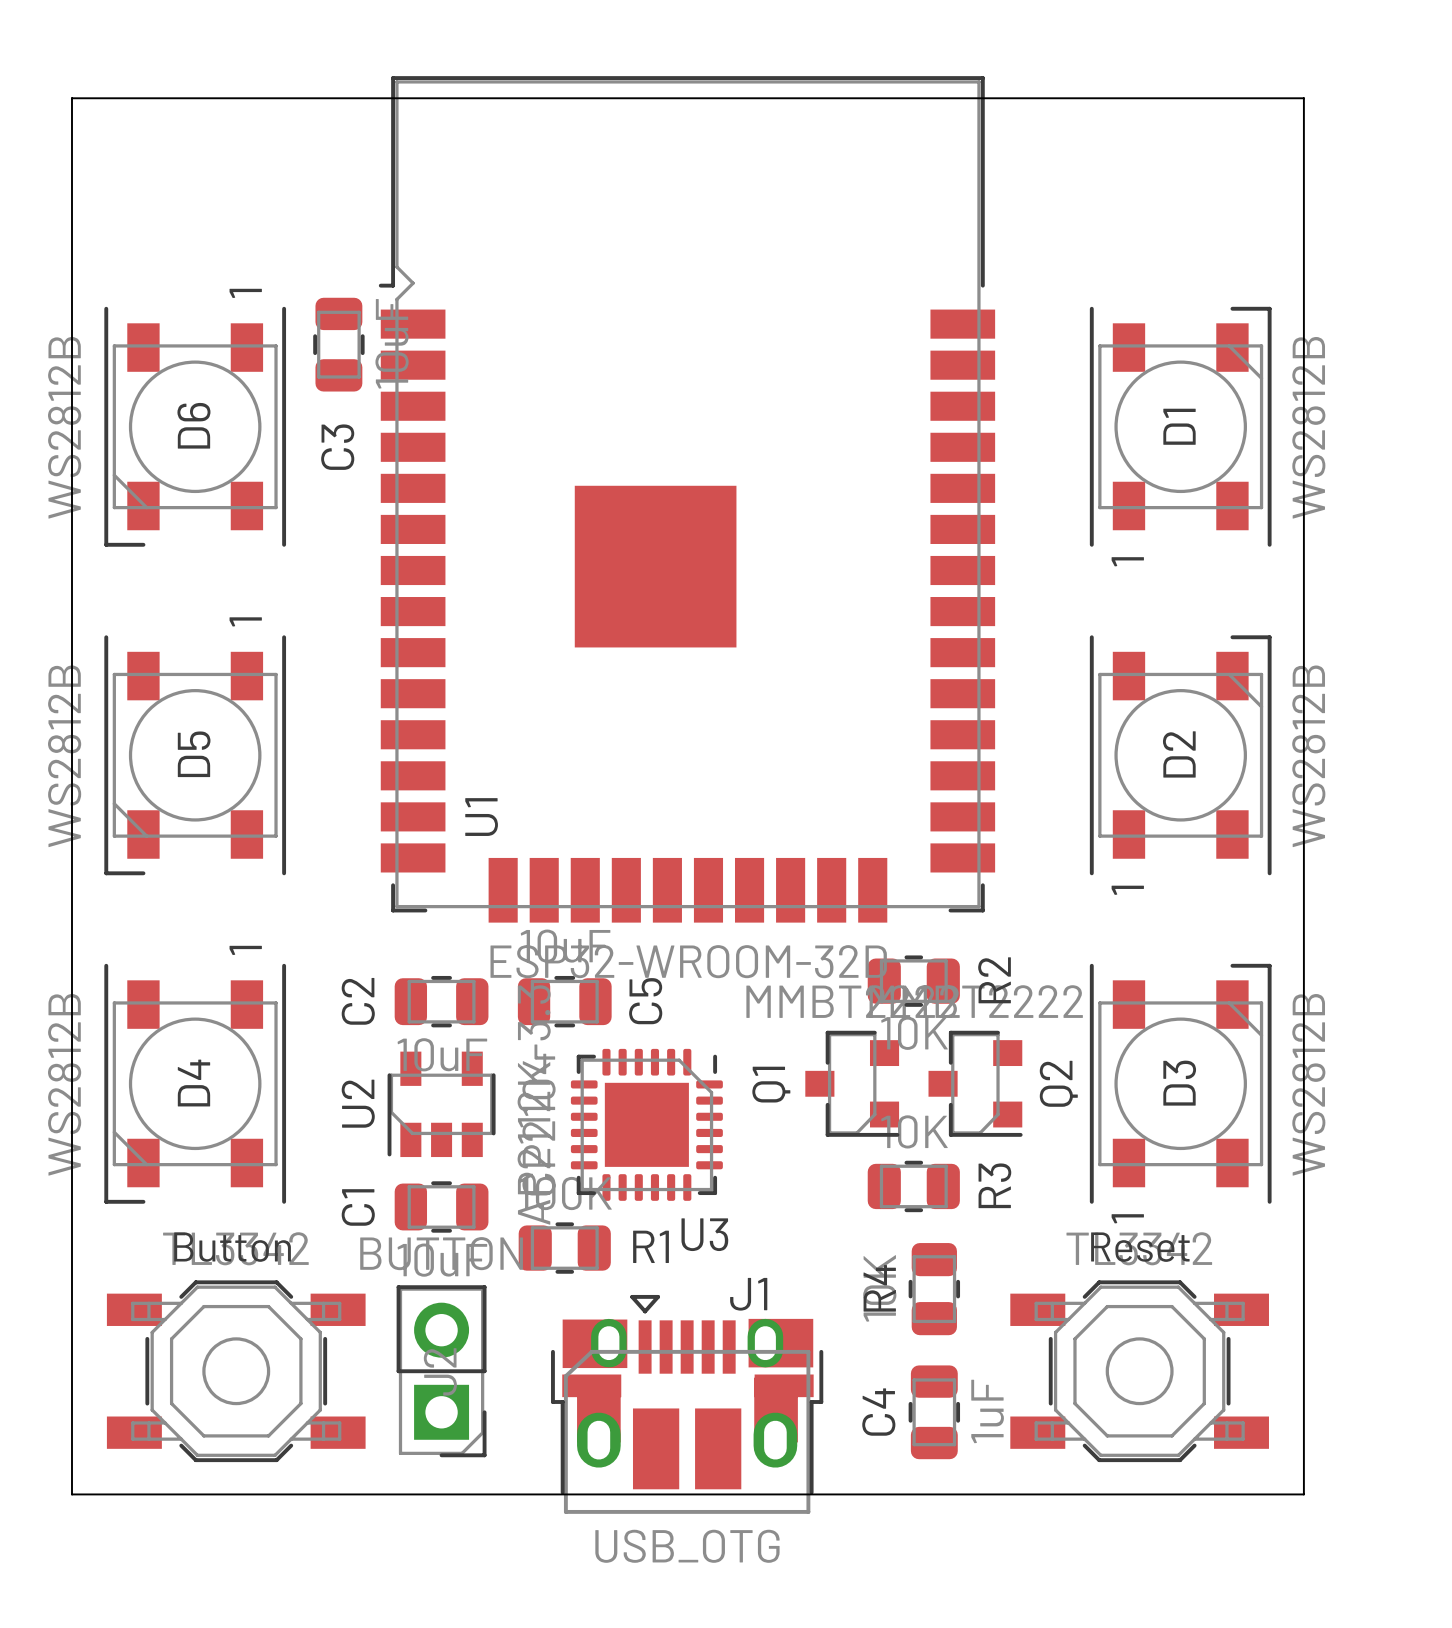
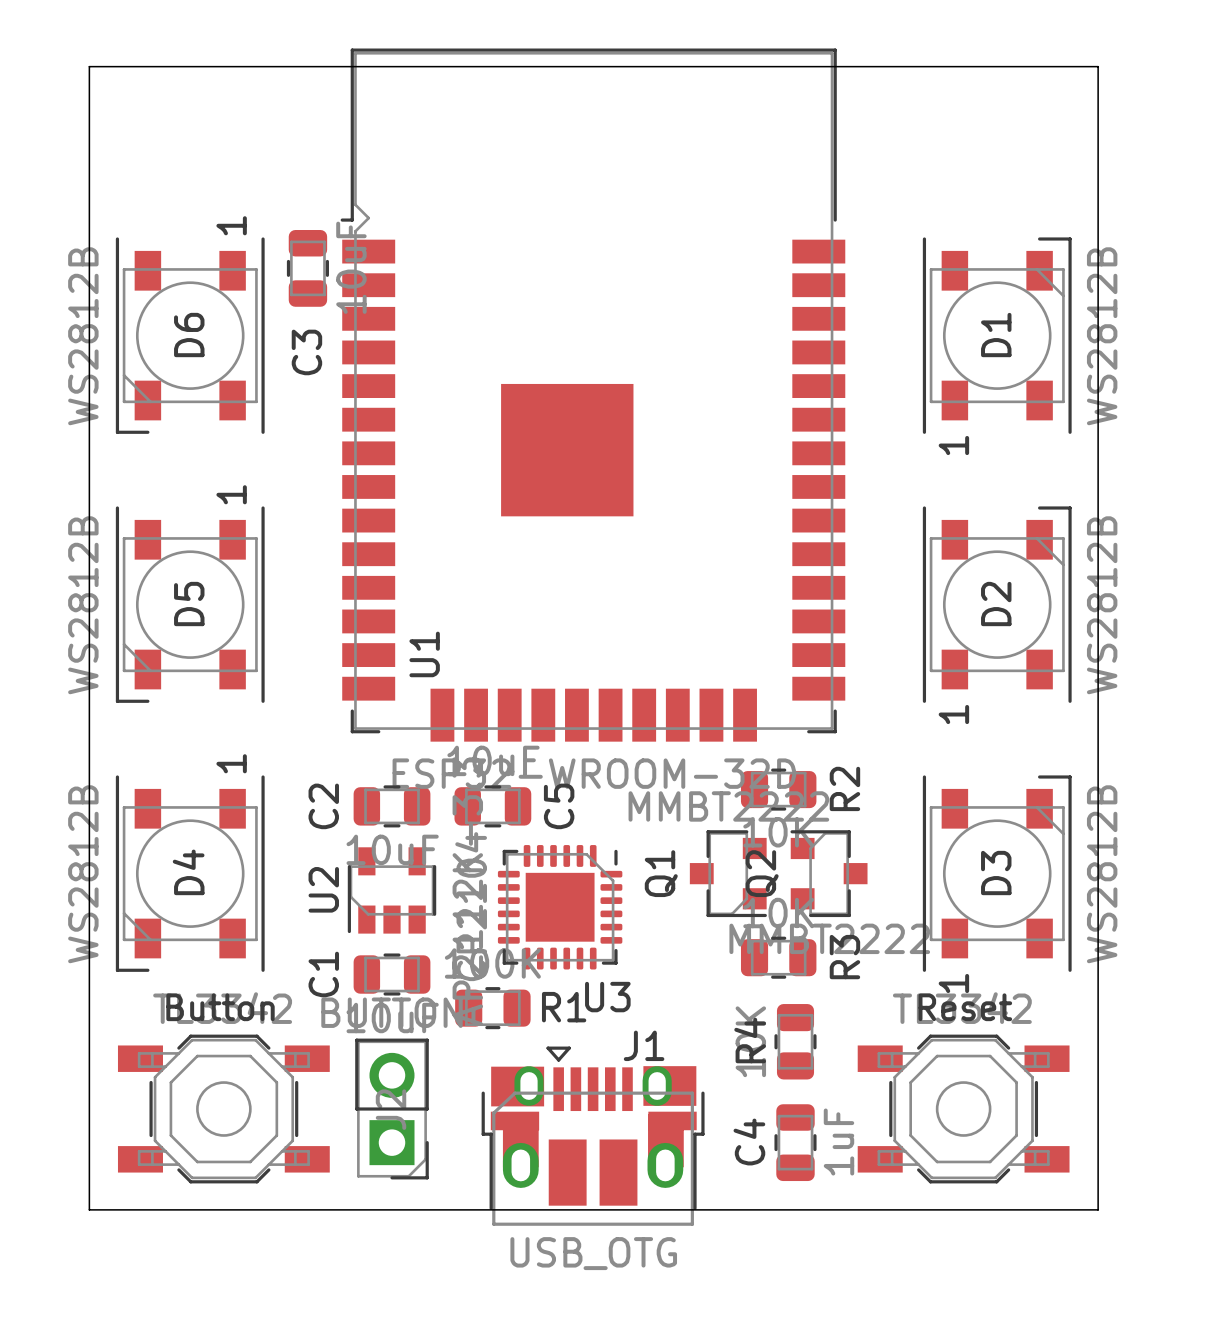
Q2 rotation: 0° (975, 1083) -> 180° (828, 873)

